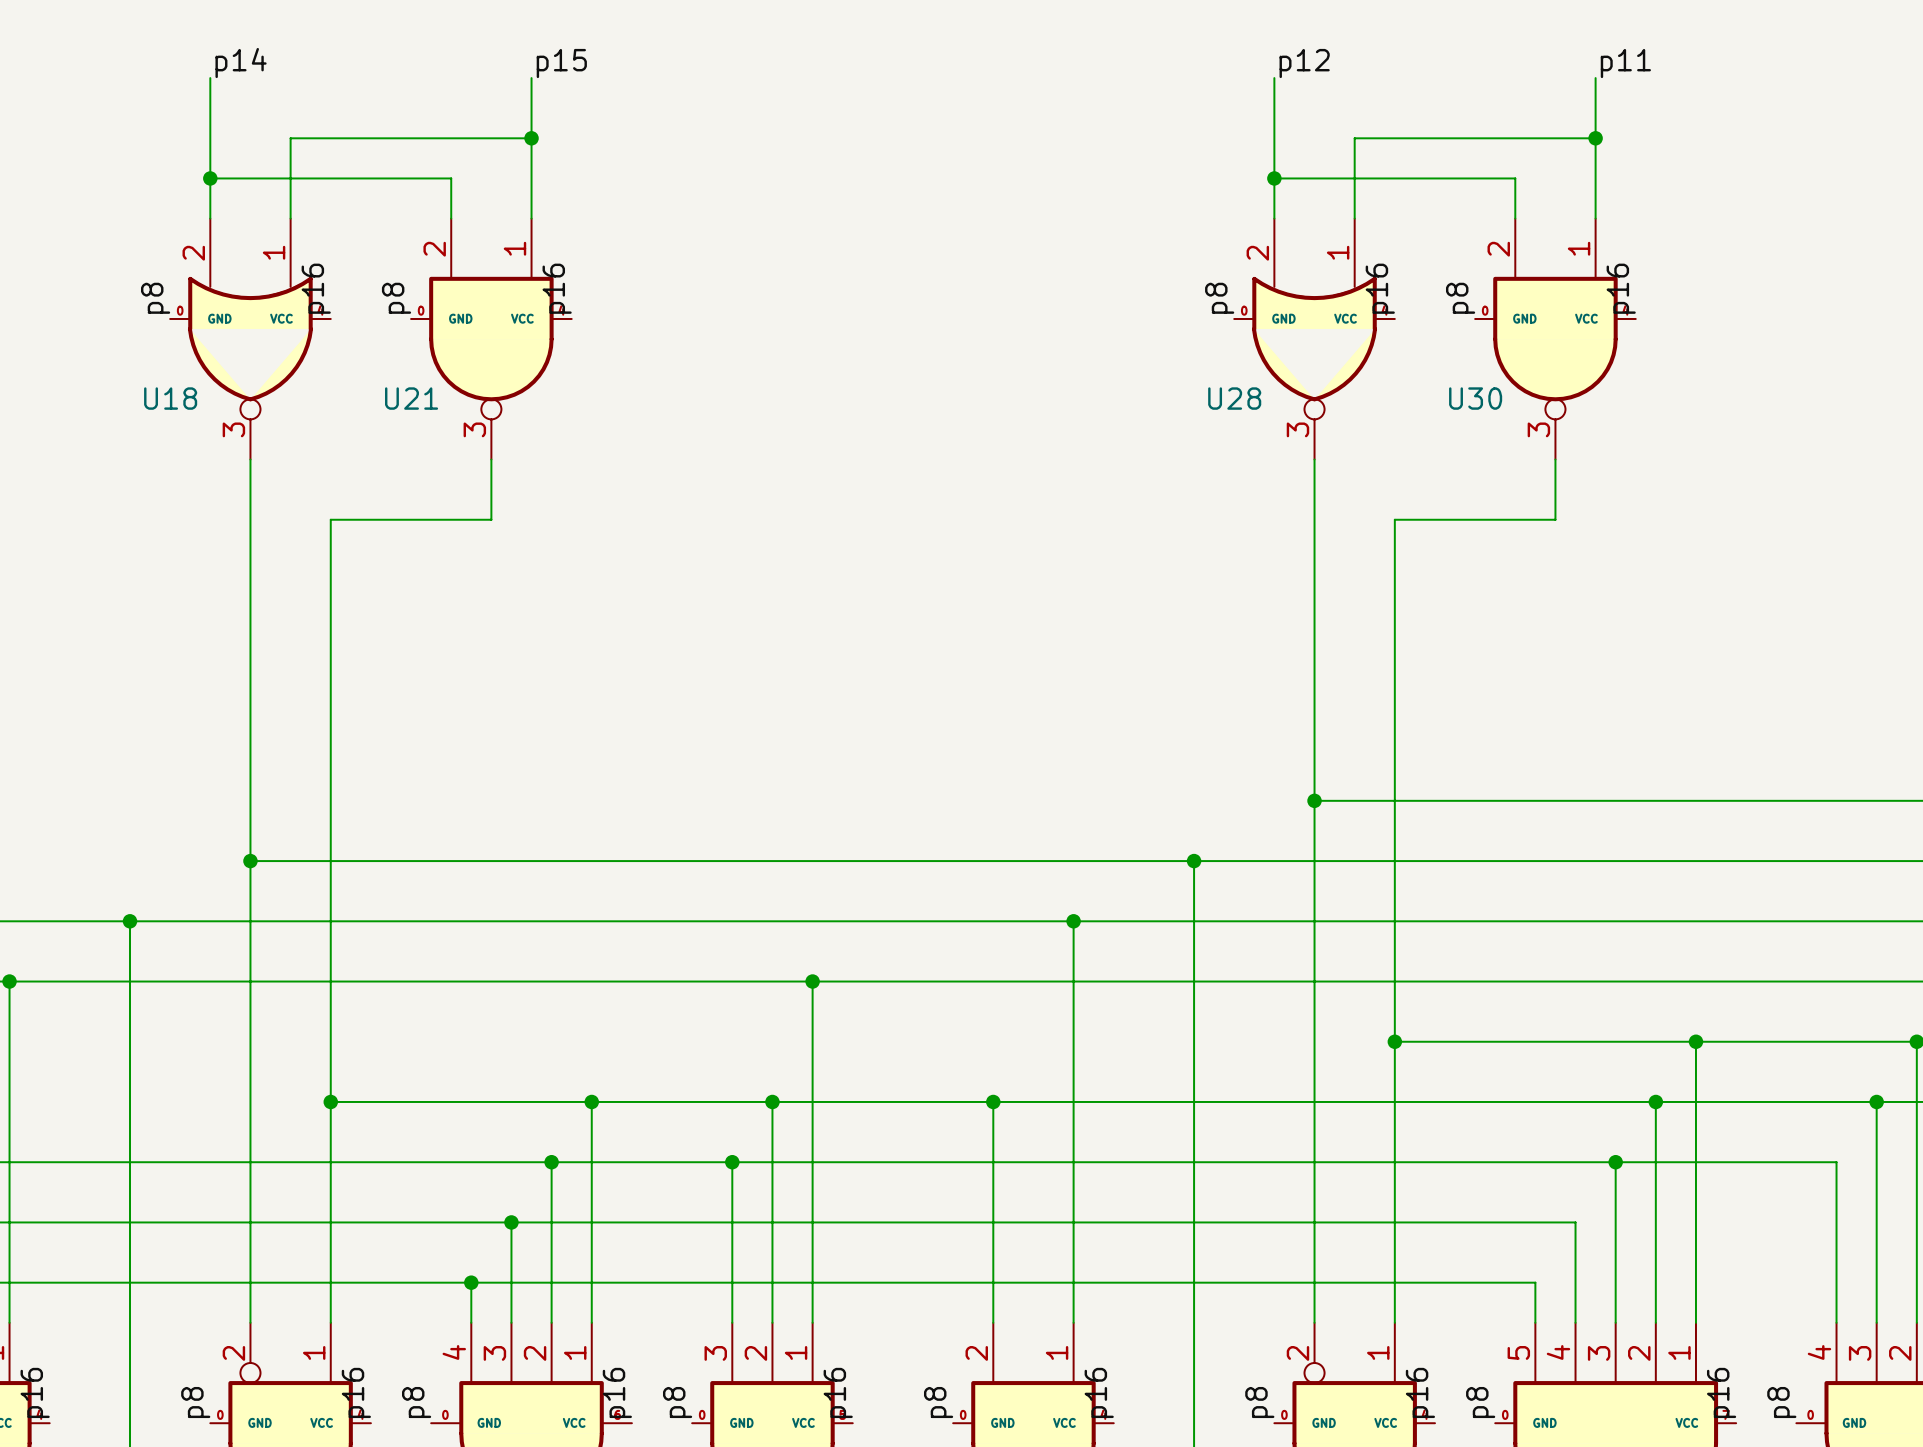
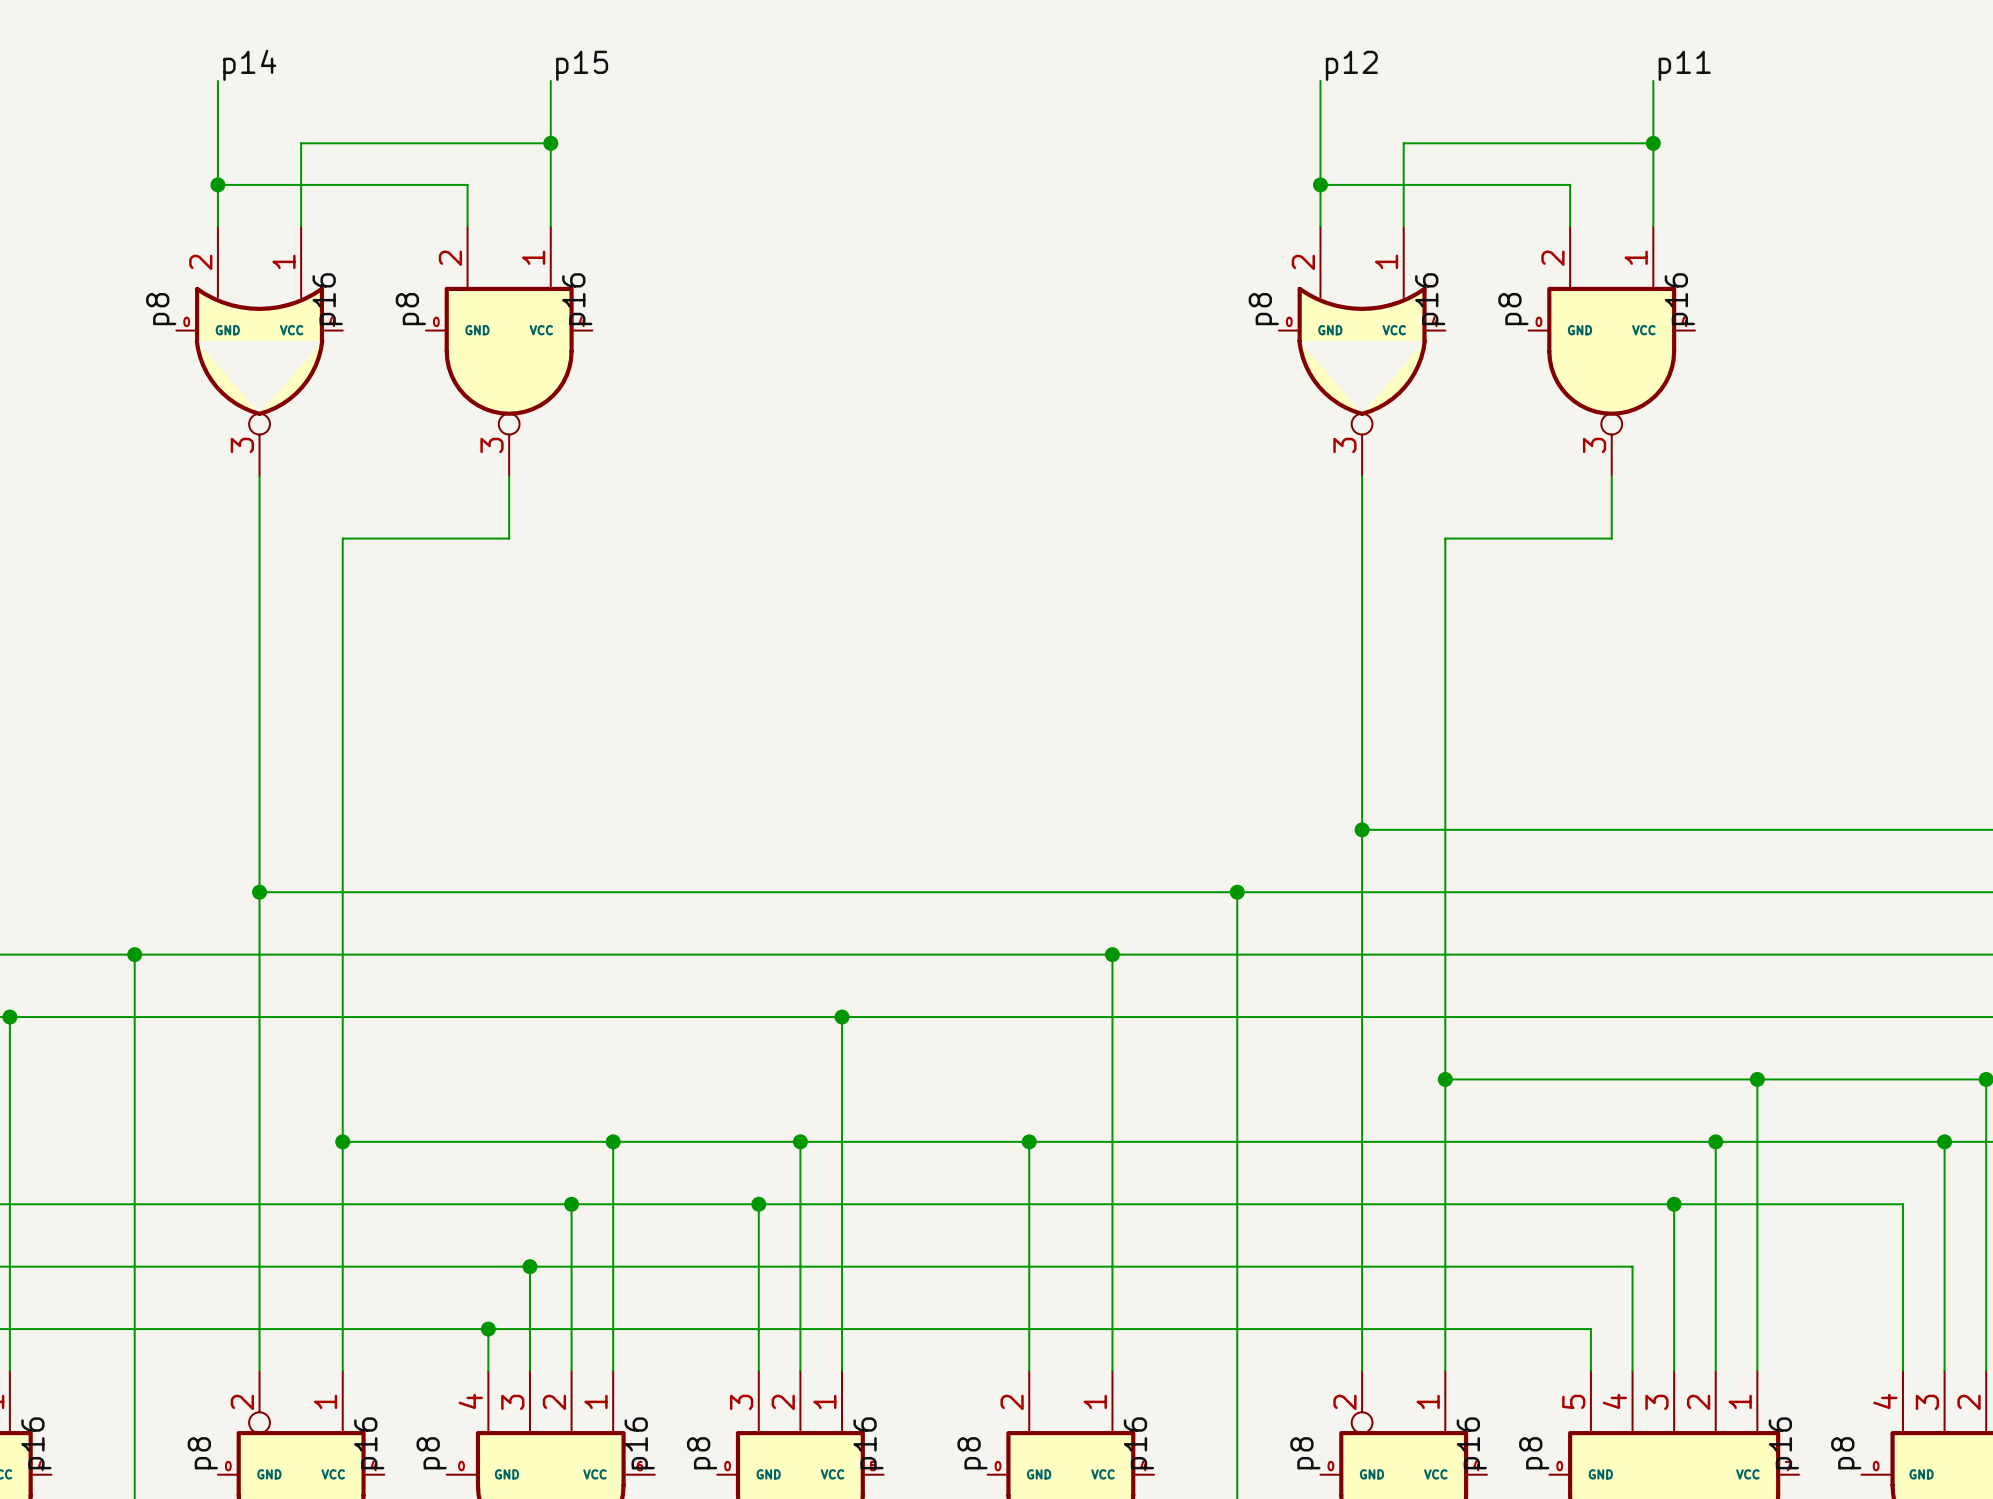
U18 name: U18 (170, 398) -> none
U21 name: U21 (411, 398) -> none
U28 name: U28 (1234, 398) -> none
U30 name: U30 (1475, 398) -> none

